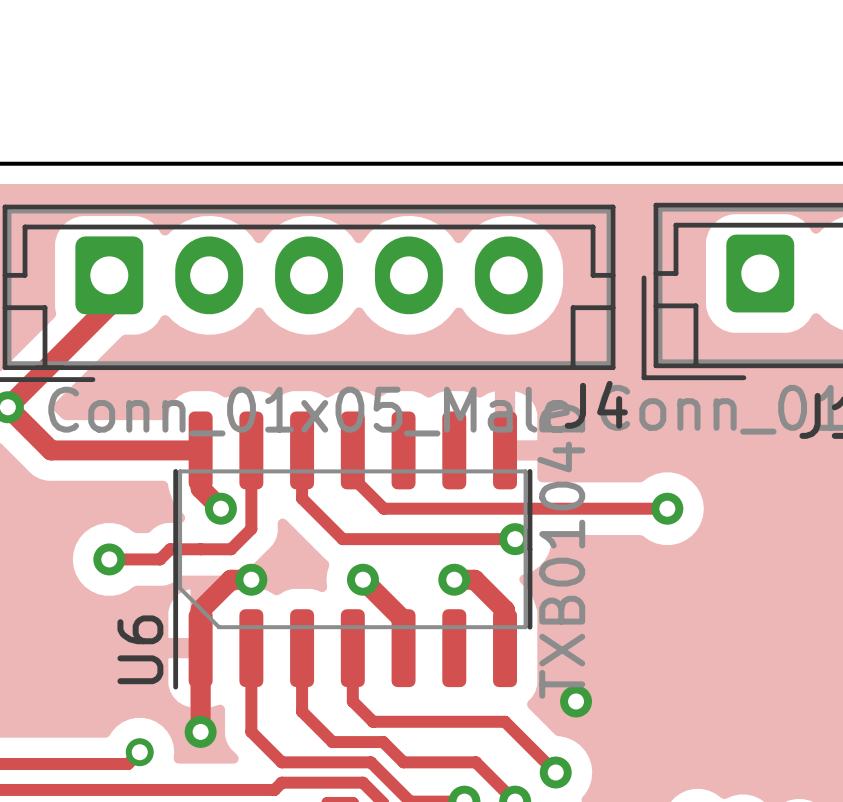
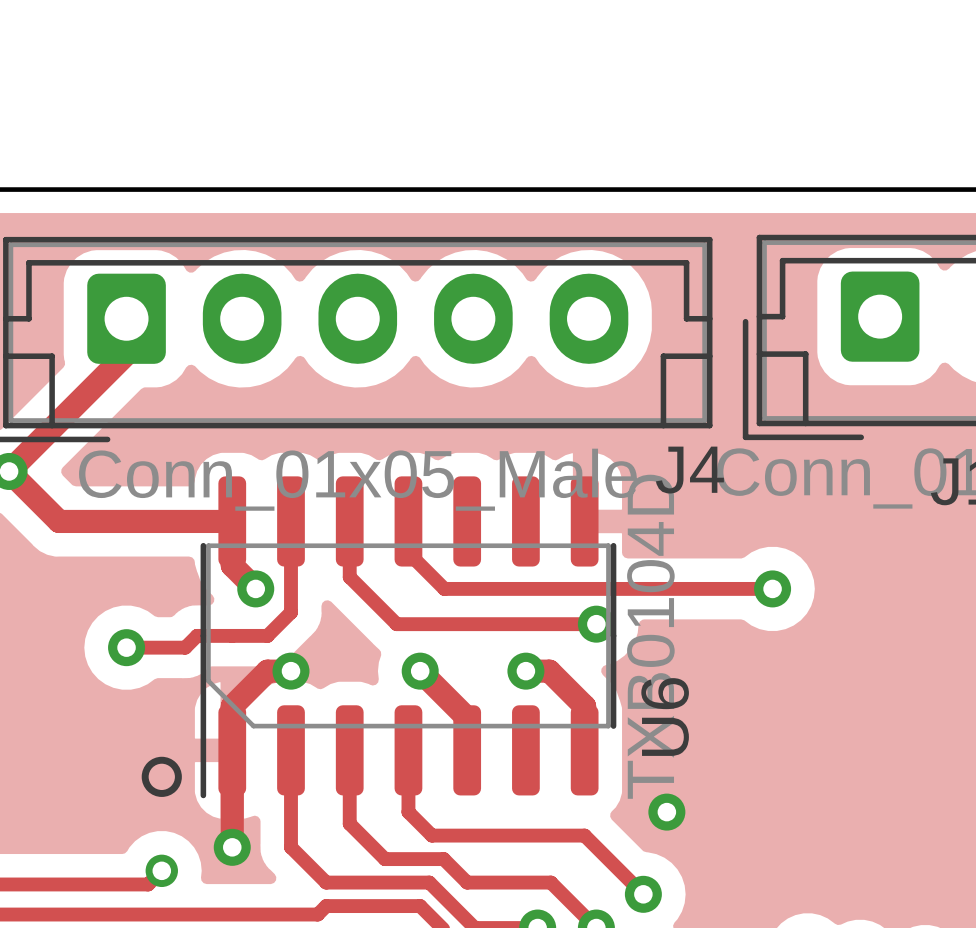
U6 name position: U6 (140, 649) -> U6 (665, 717)
drawing: none -> [141, 756, 182, 797]

